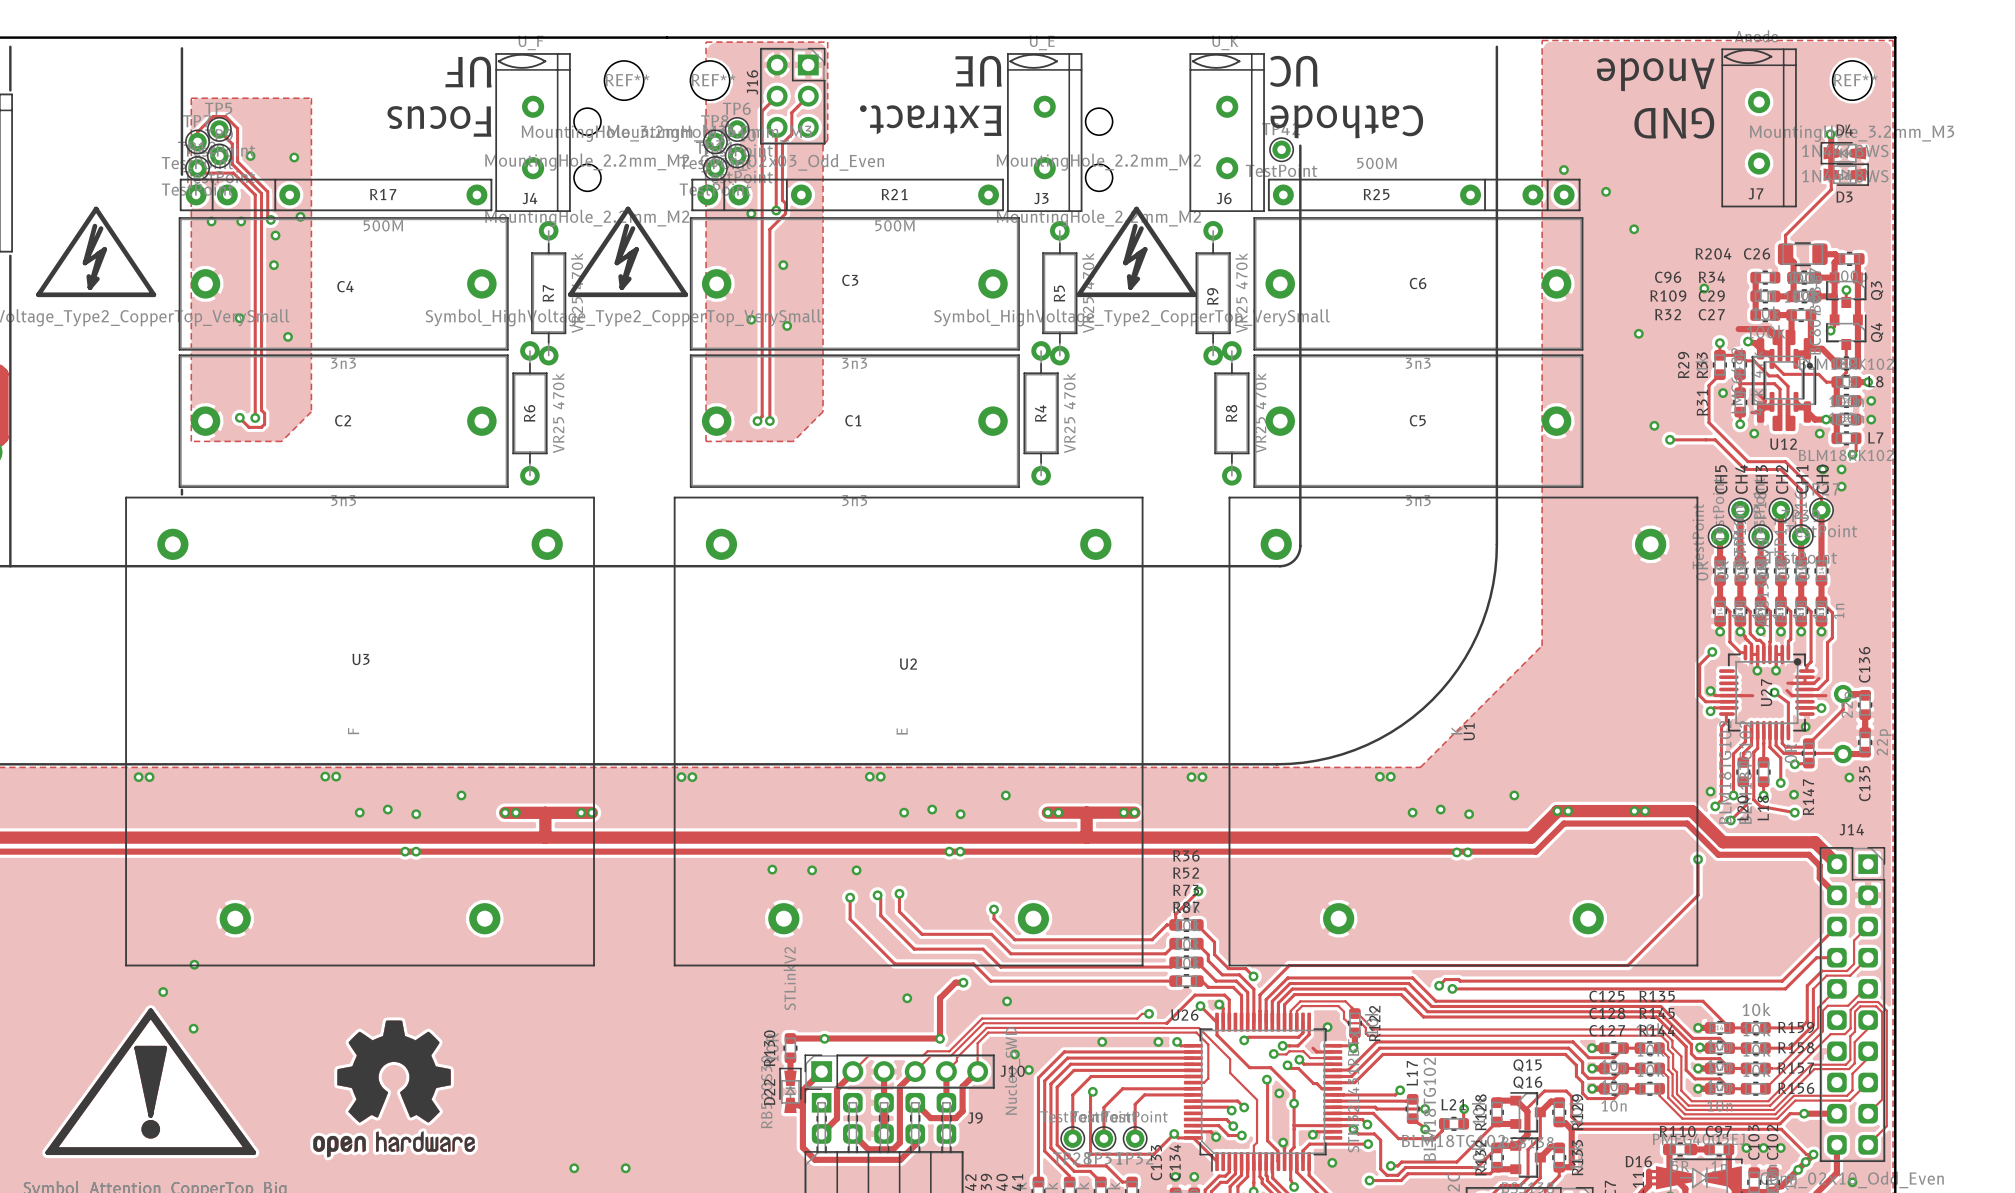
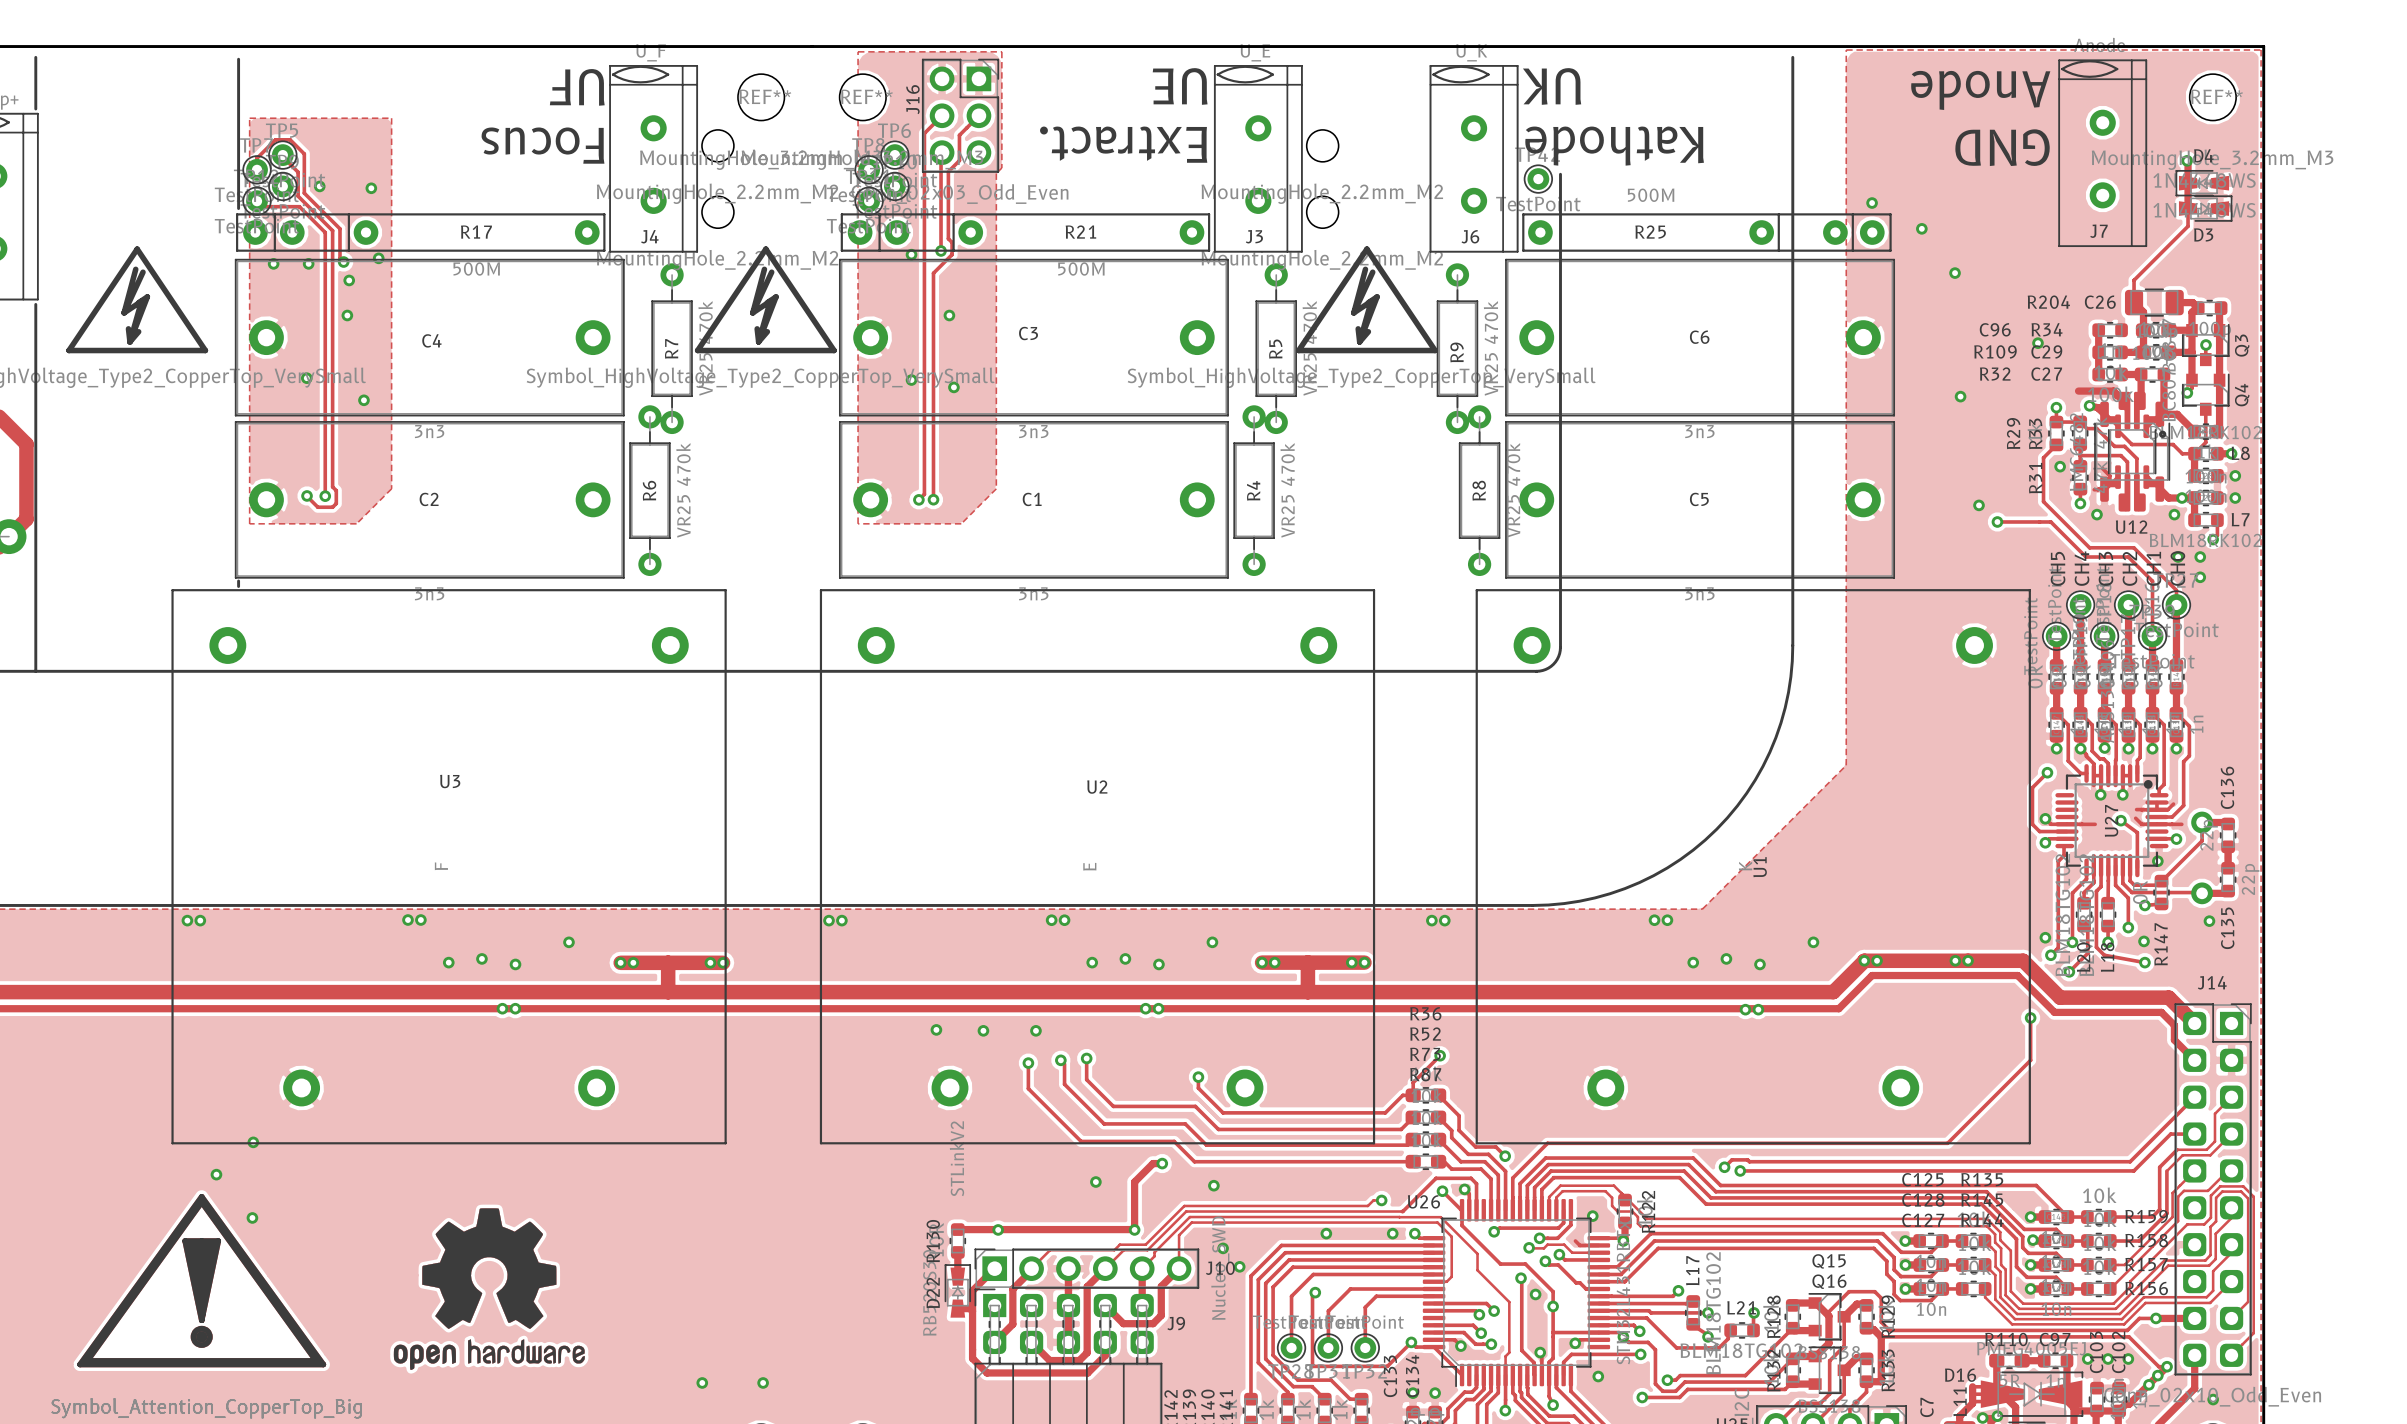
text: UC (1293, 71) -> UK (1552, 86)
text: Cathode (1346, 121) -> Kathode (1614, 146)

